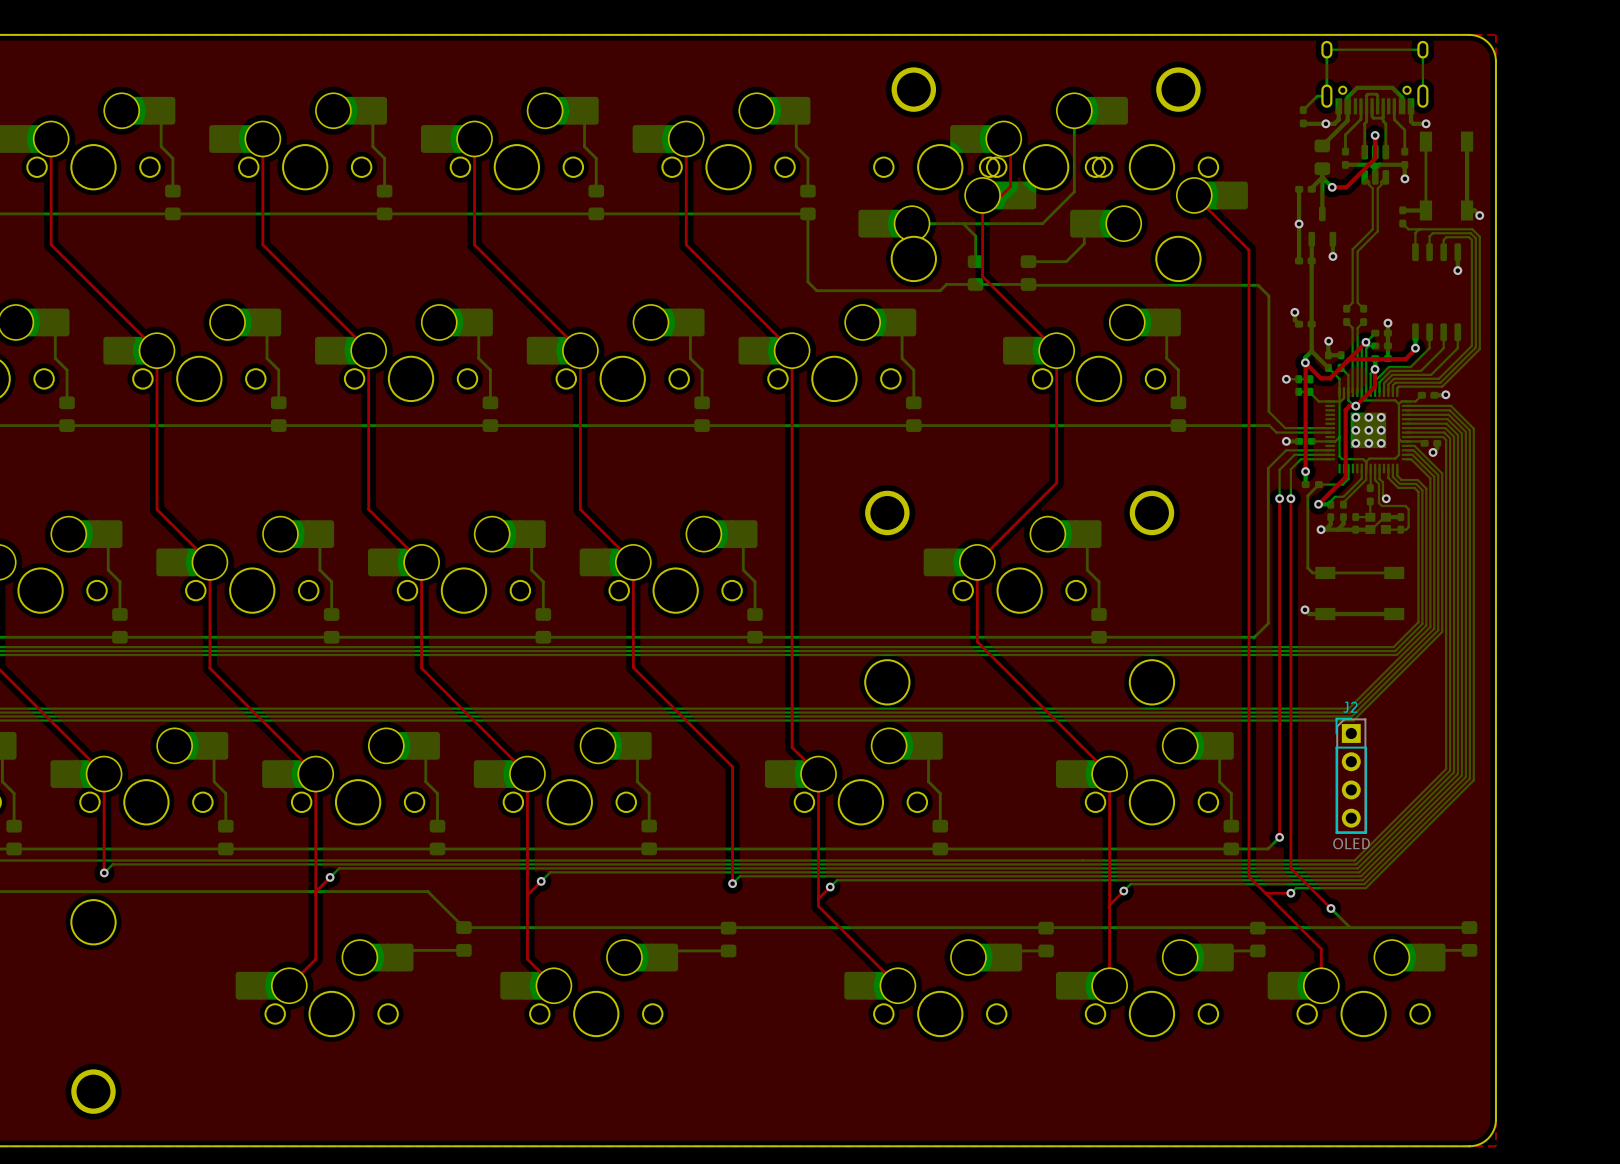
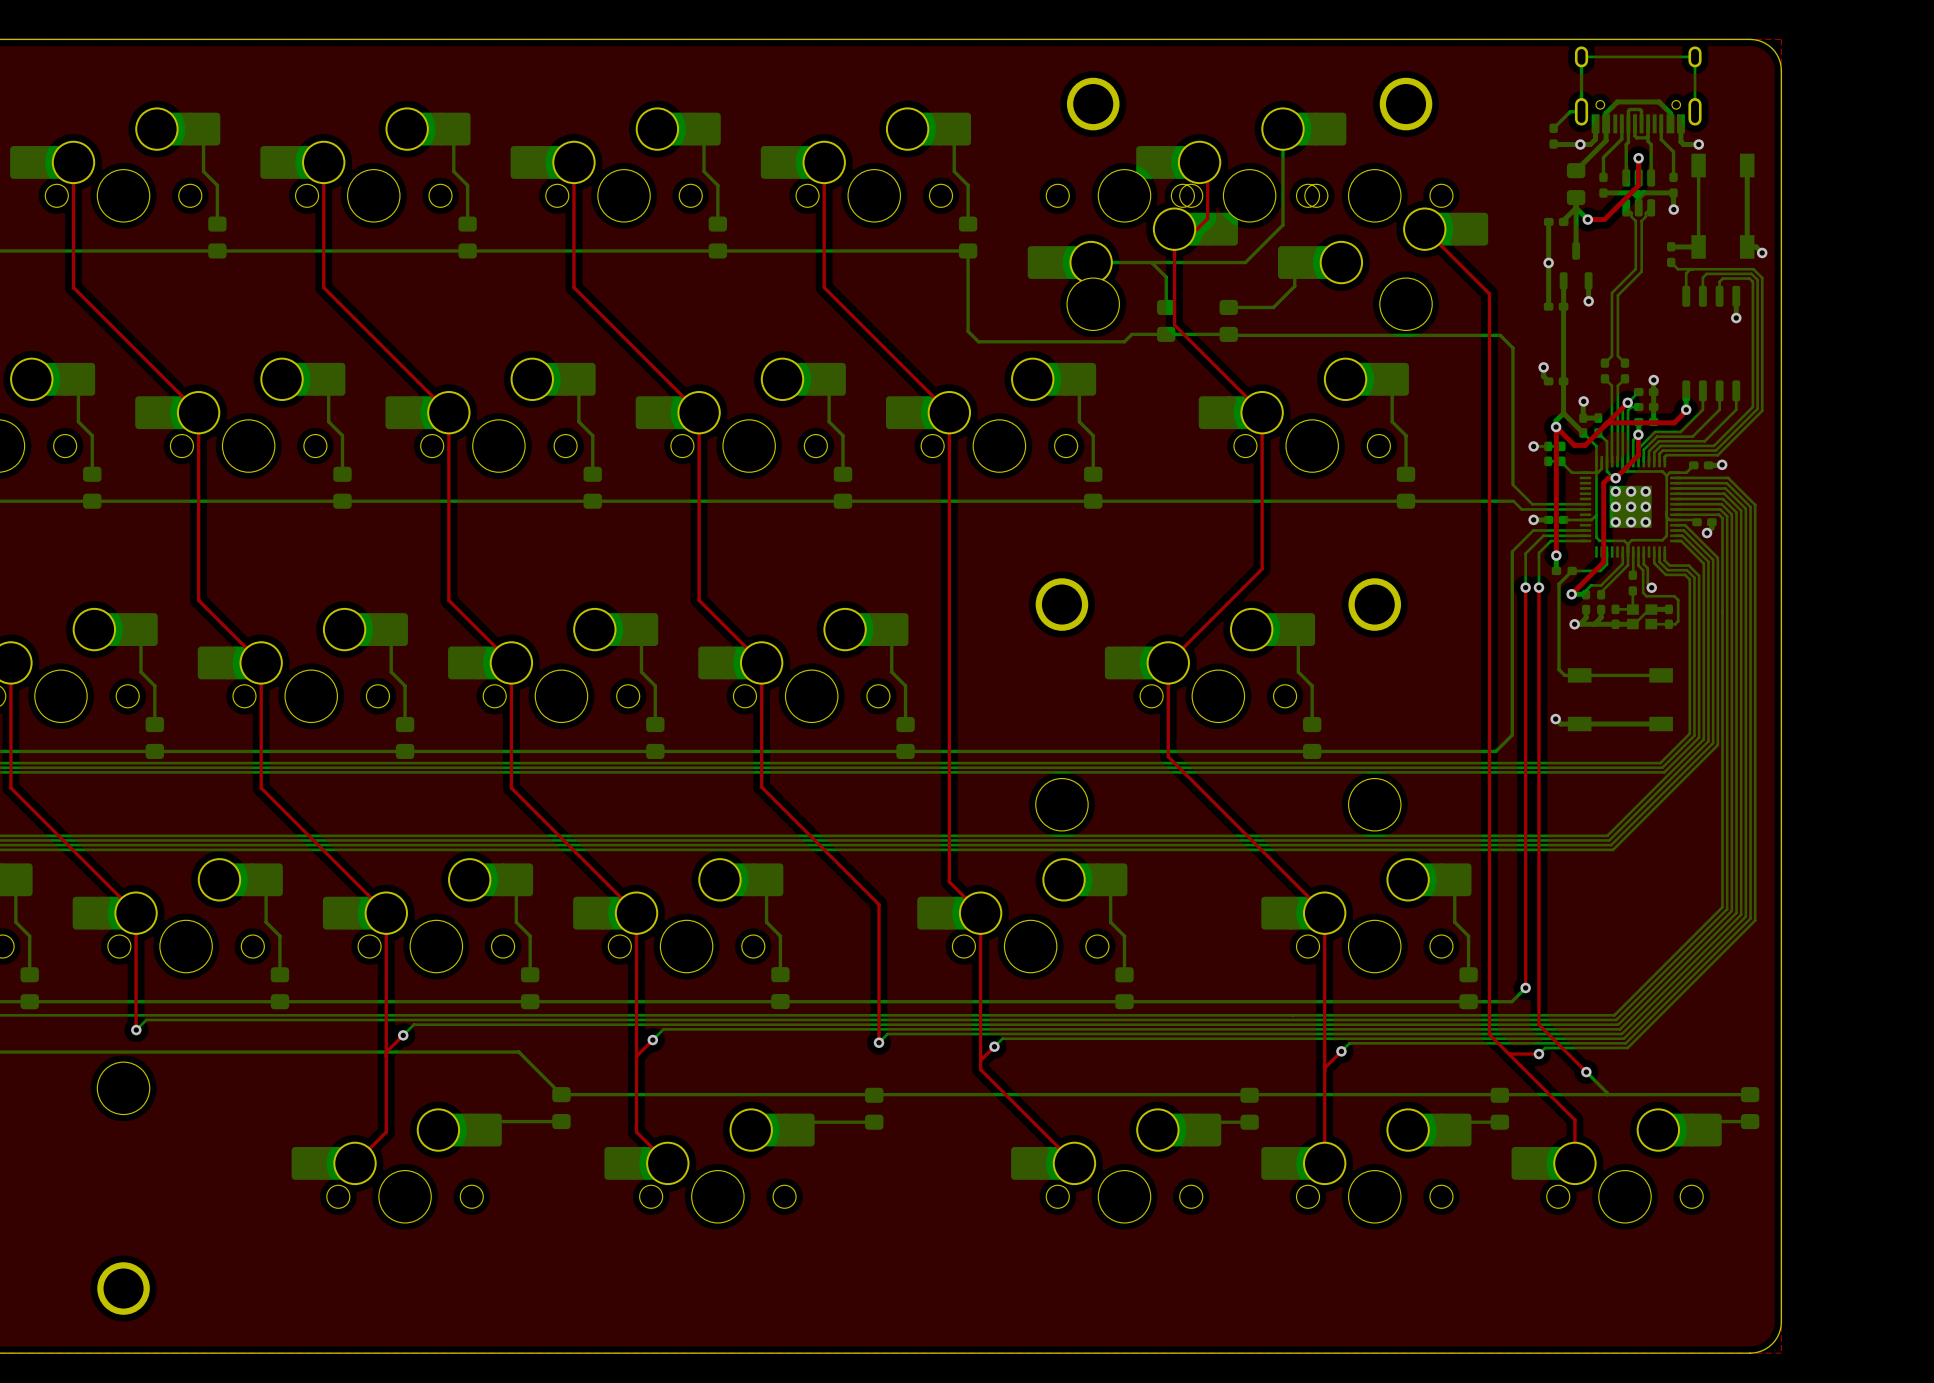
J2: OLED (1351, 775) -> none

